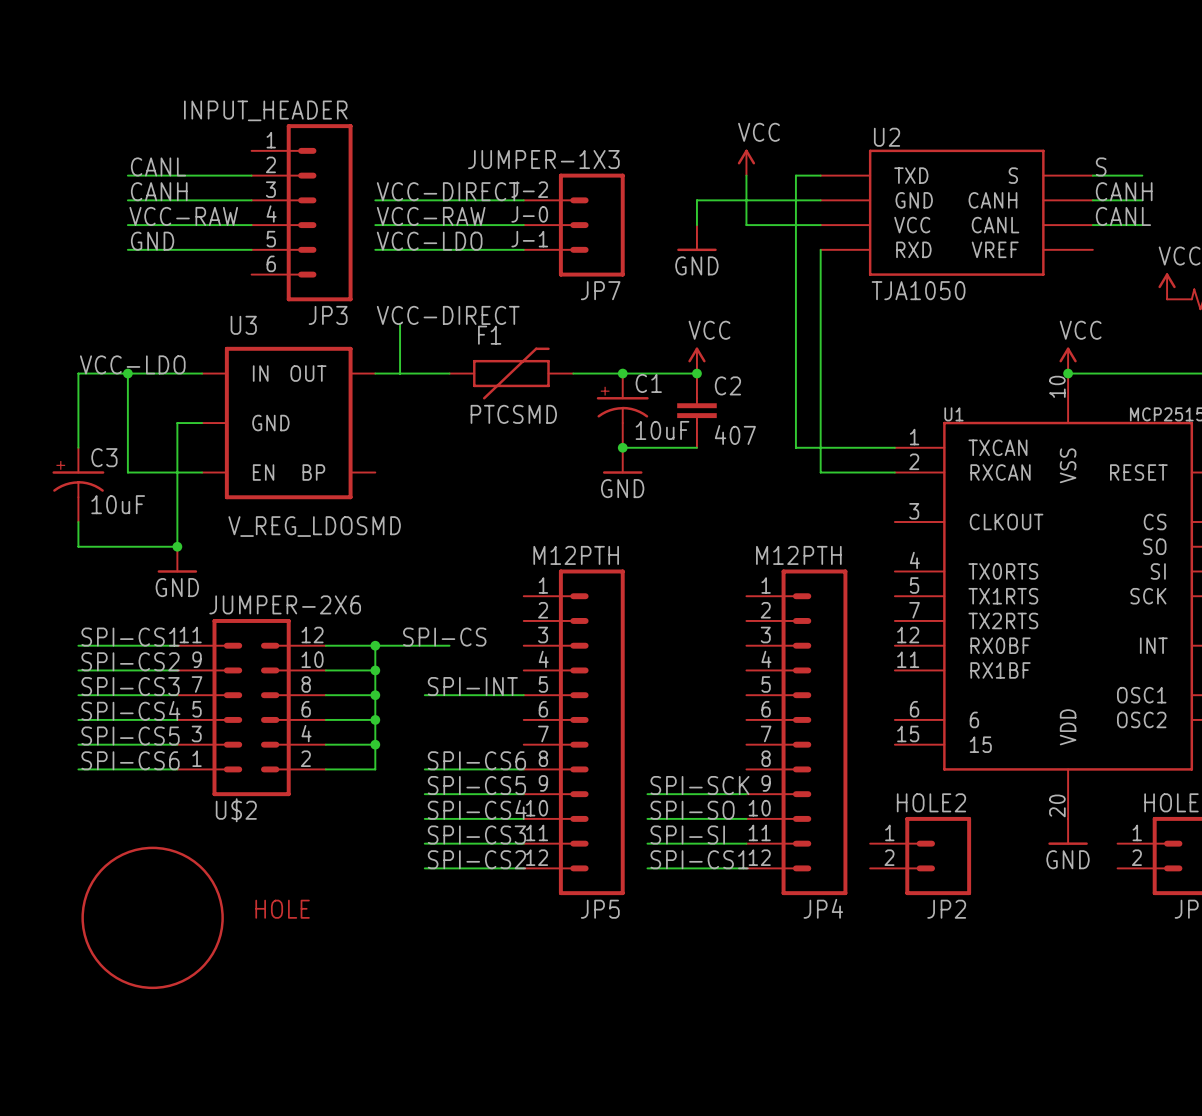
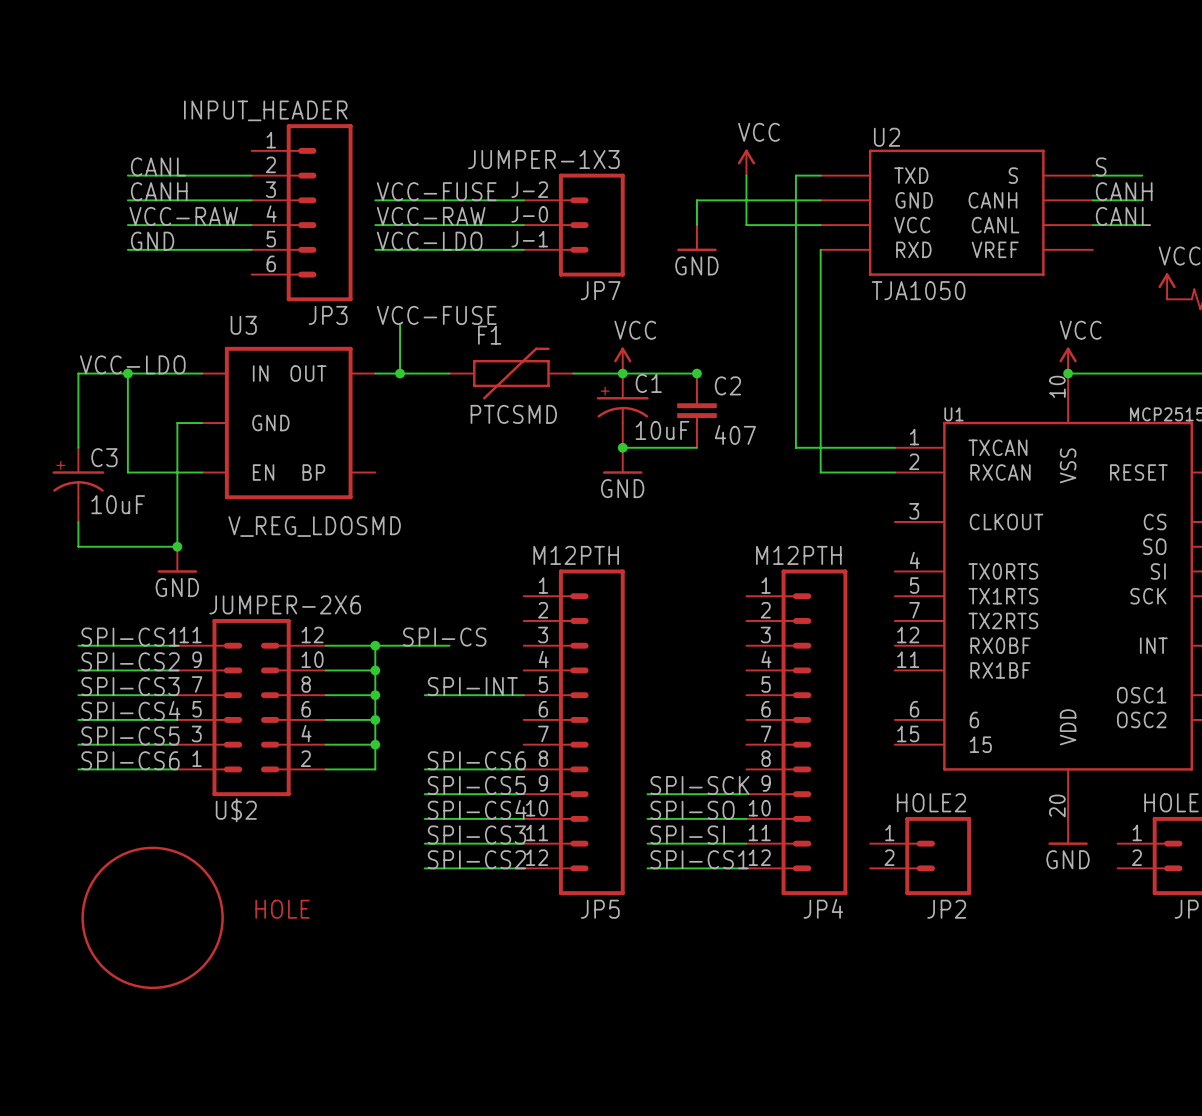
label: VCC-DIRECT (448, 191) -> VCC-FUSE (436, 191)
label: VCC-DIRECT (448, 315) -> VCC-FUSE (436, 315)
power symbol position: VCC (696, 360) -> VCC (622, 360)
junction: none -> (400, 373)

